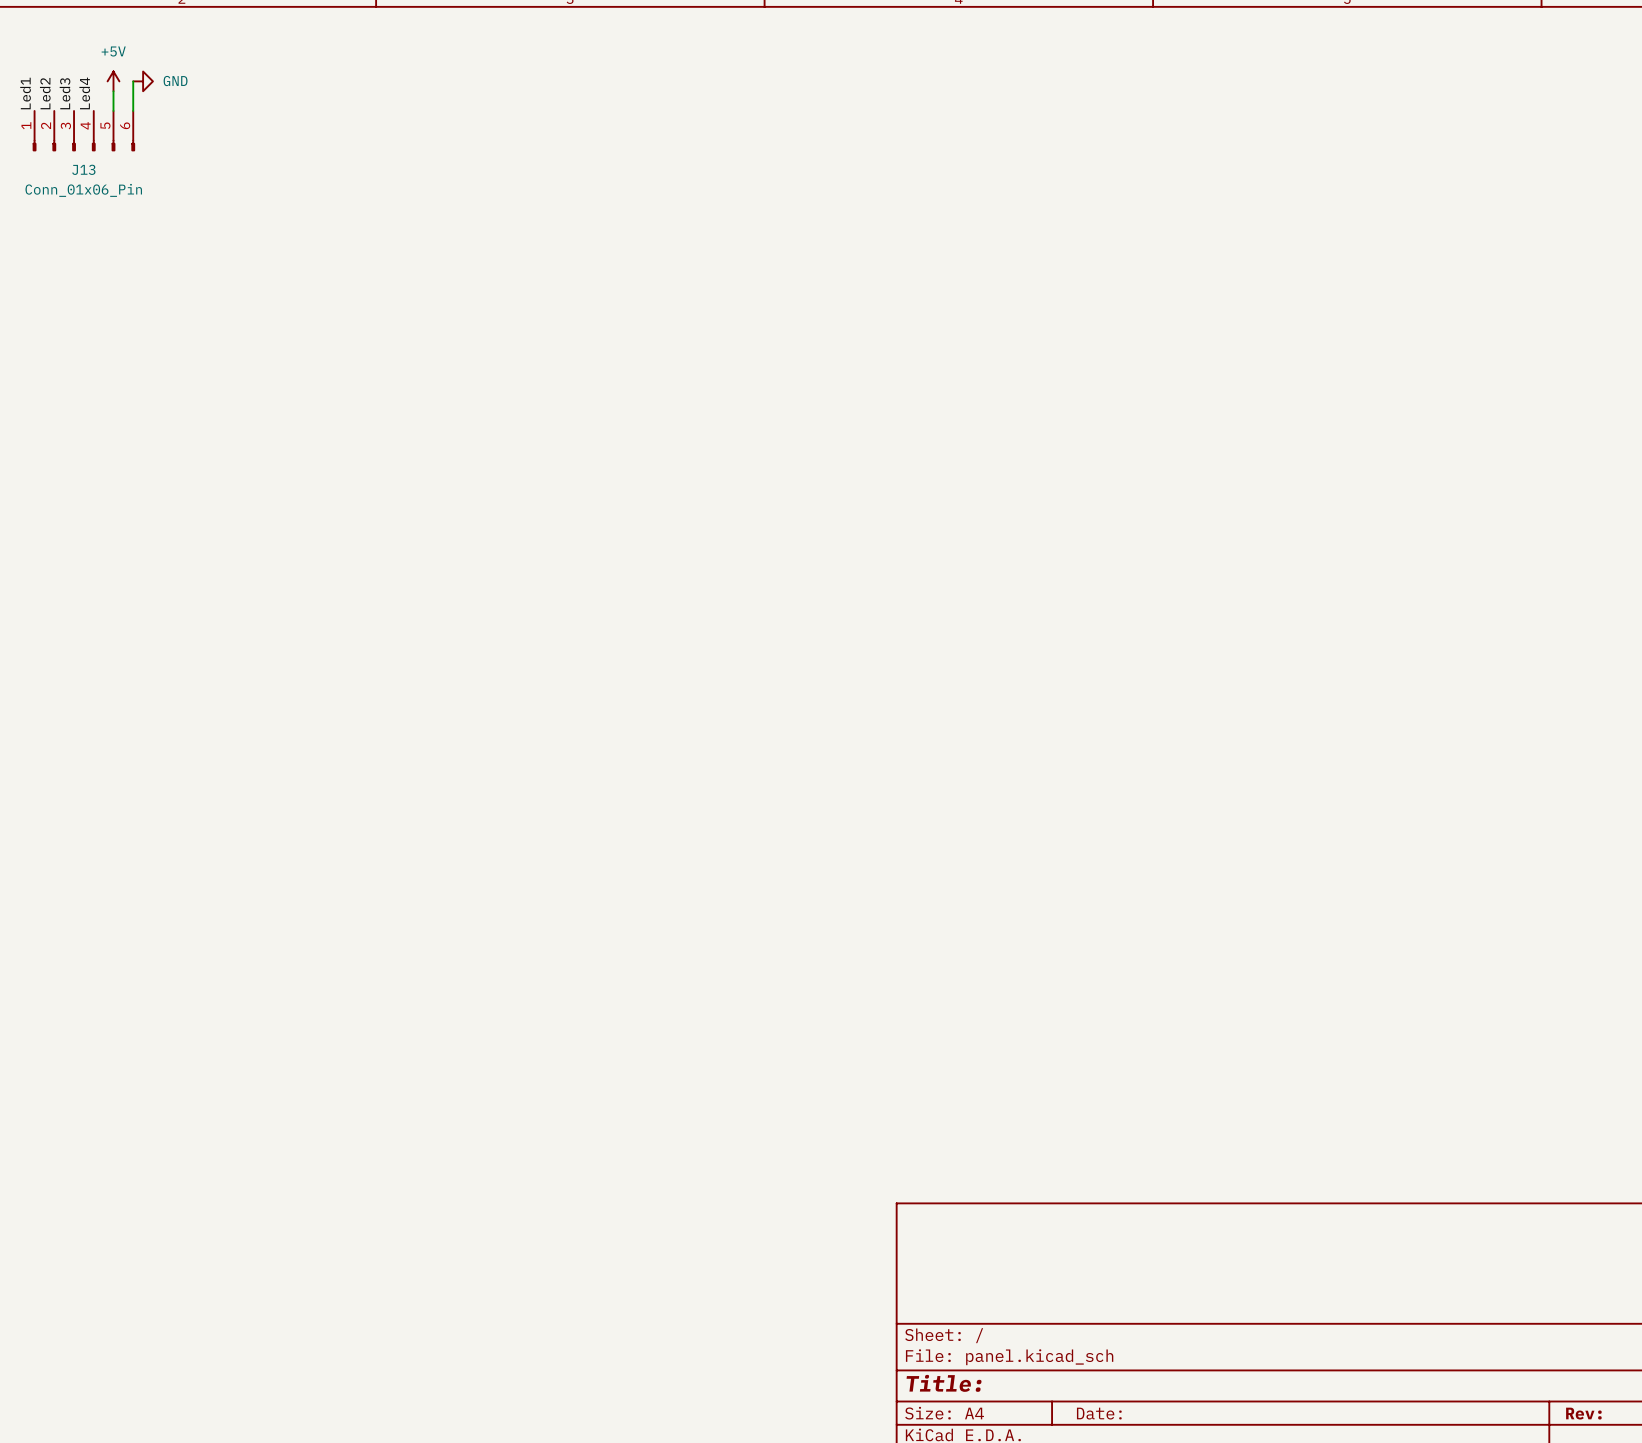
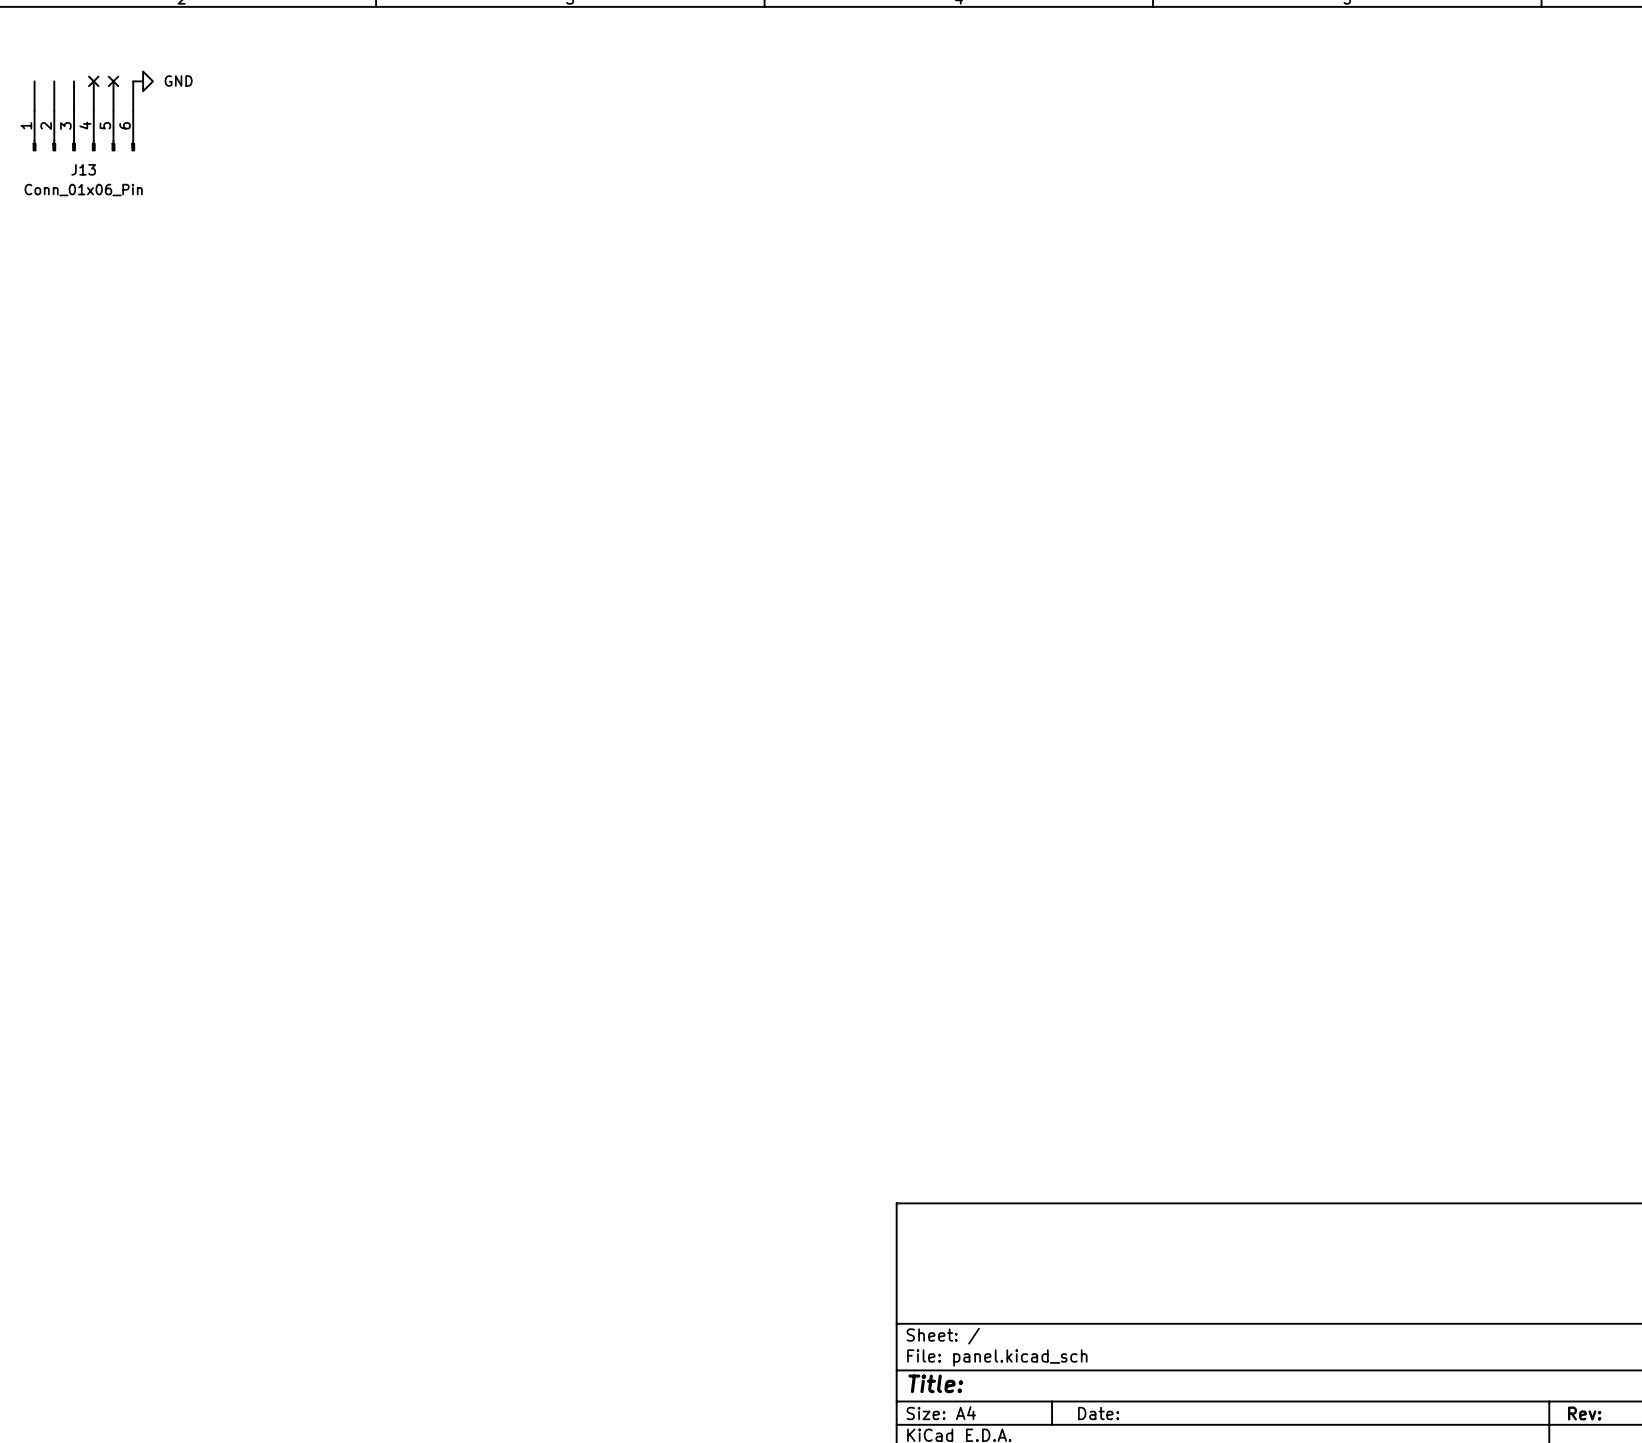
wire: none -> (34, 81) (34, 110)
wire: none -> (54, 81) (54, 110)
wire: none -> (74, 81) (74, 110)
wire: none -> (93, 81) (93, 110)
no-connect mark: none -> (93, 81)
power symbol: +5V (113, 81) -> none
no-connect mark: none -> (113, 81)
label: Led1 (25, 93) -> none
label: Led2 (45, 93) -> none
label: Led3 (65, 93) -> none
label: Led4 (84, 93) -> none

